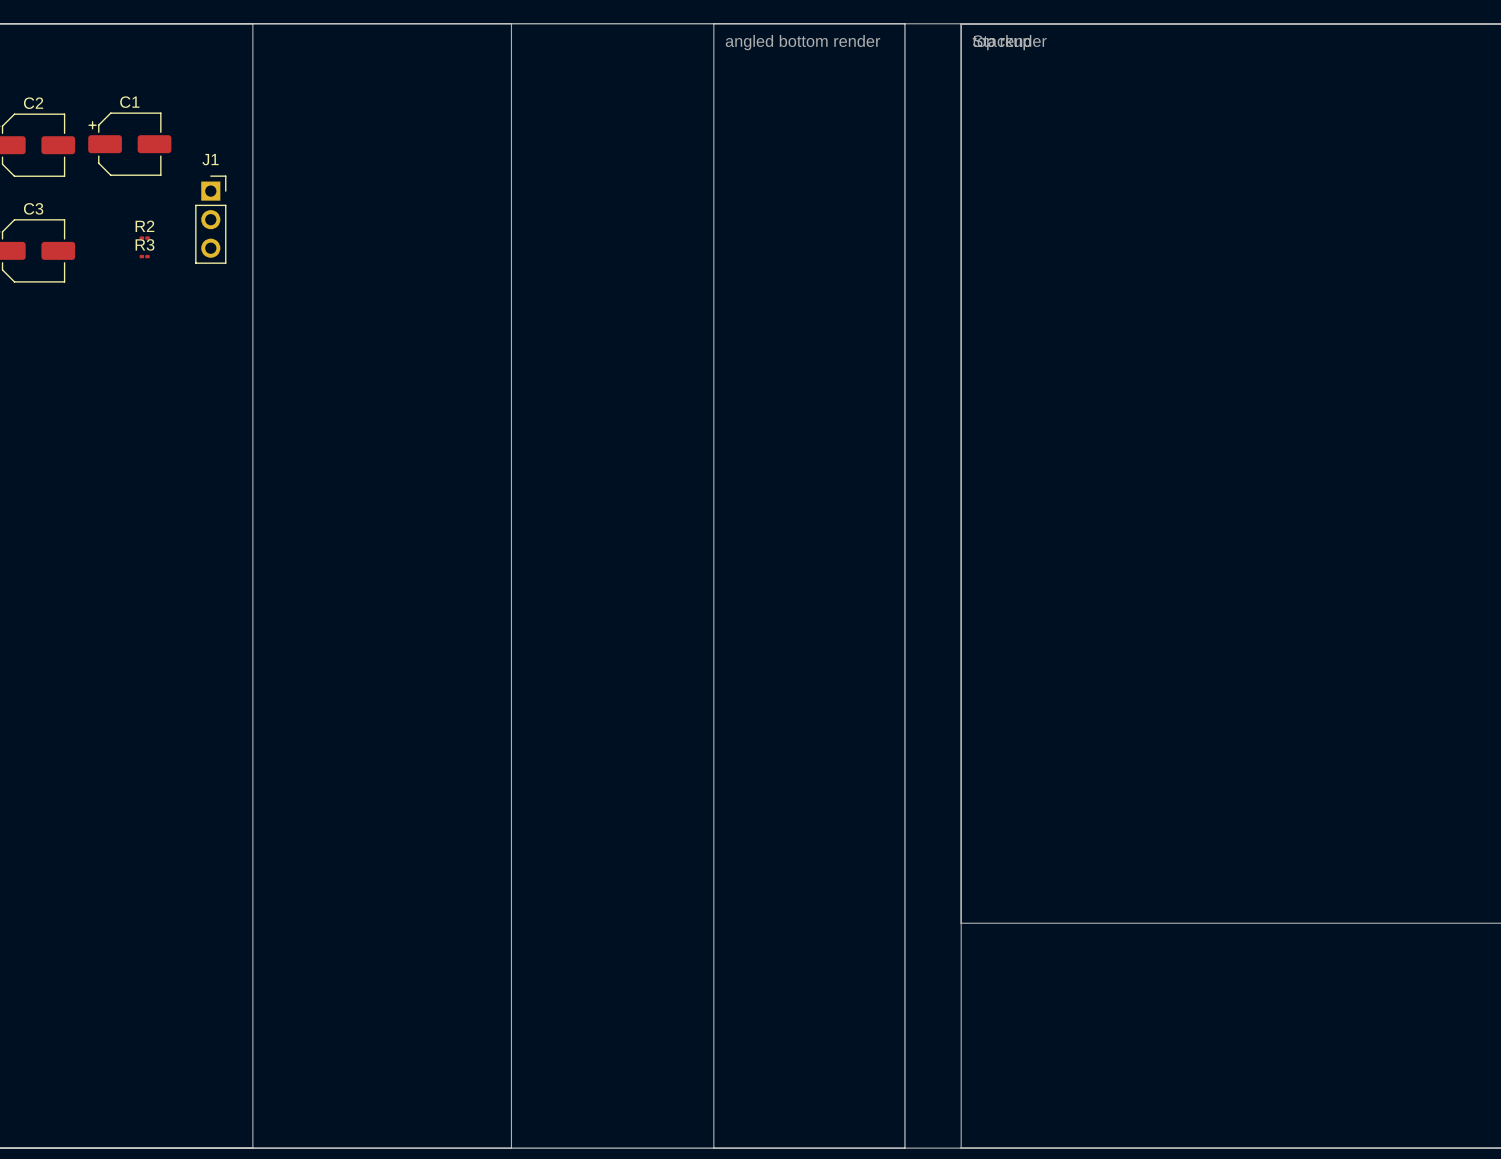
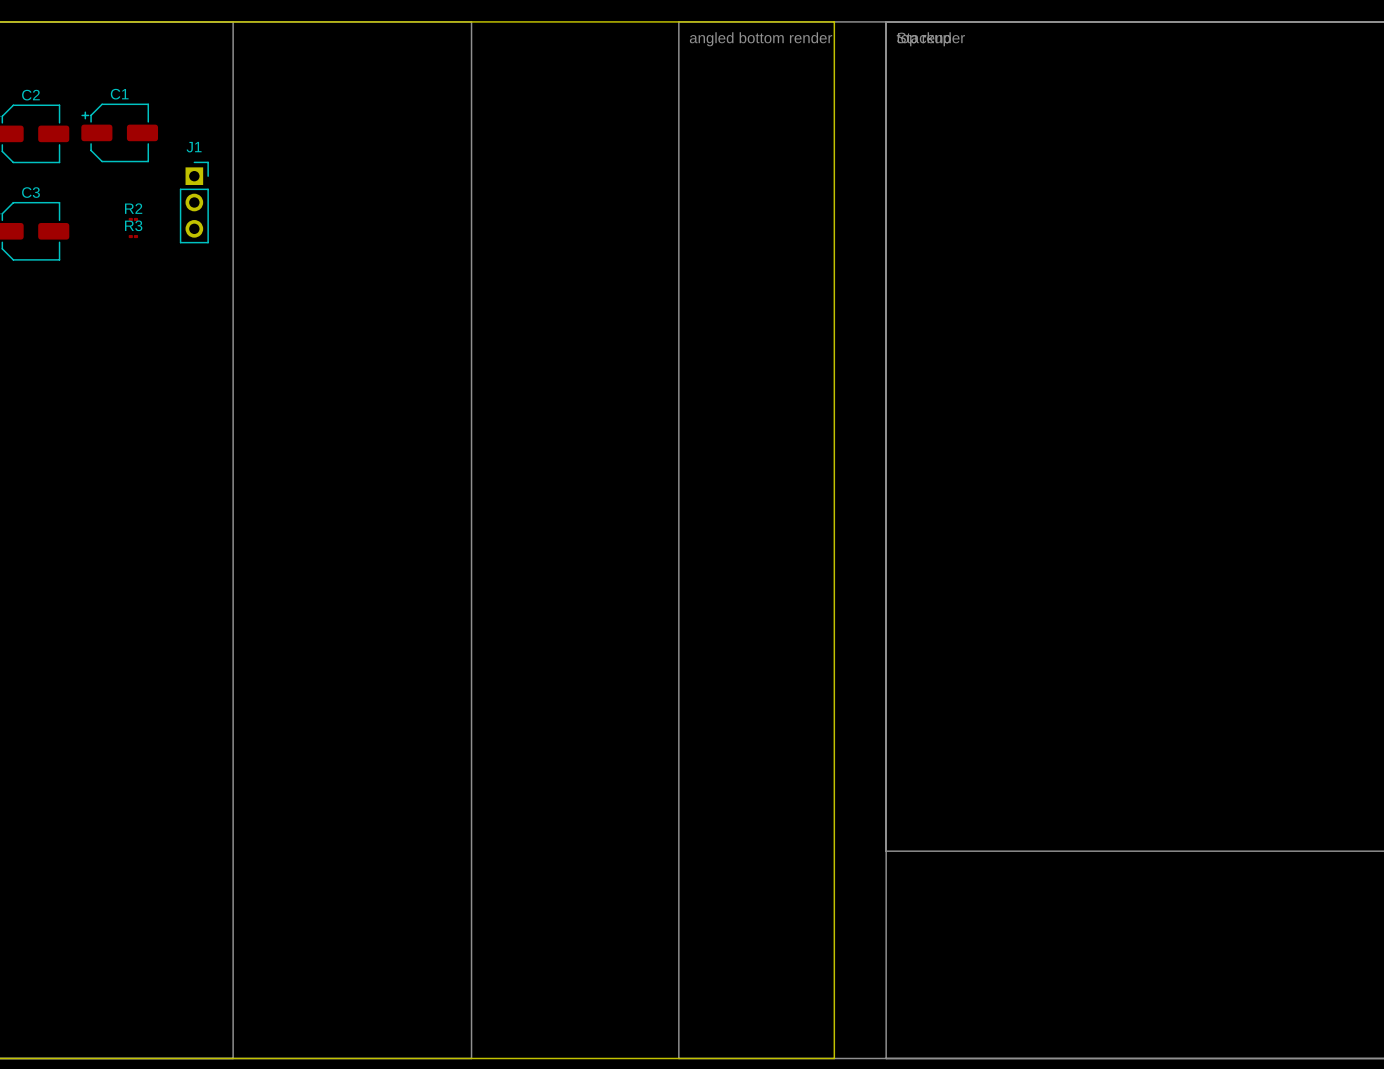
line: (736, 23) (713, 23) (713, 1148) (736, 1148) -> (678, 21) (678, 1058)
text position: angled bottom render (802, 42) -> angled bottom render (761, 39)

